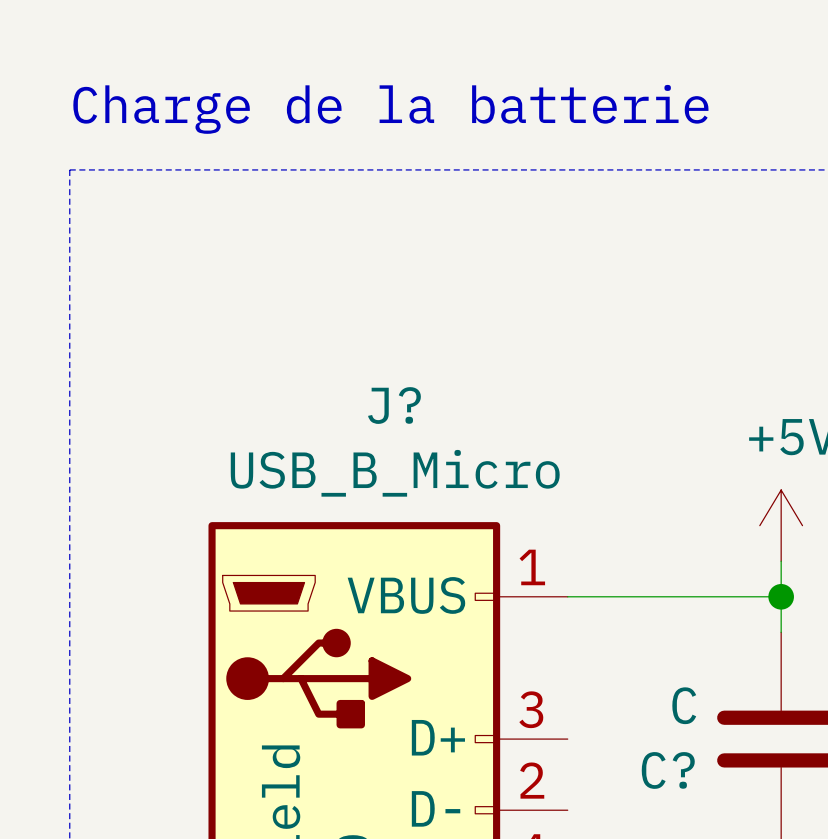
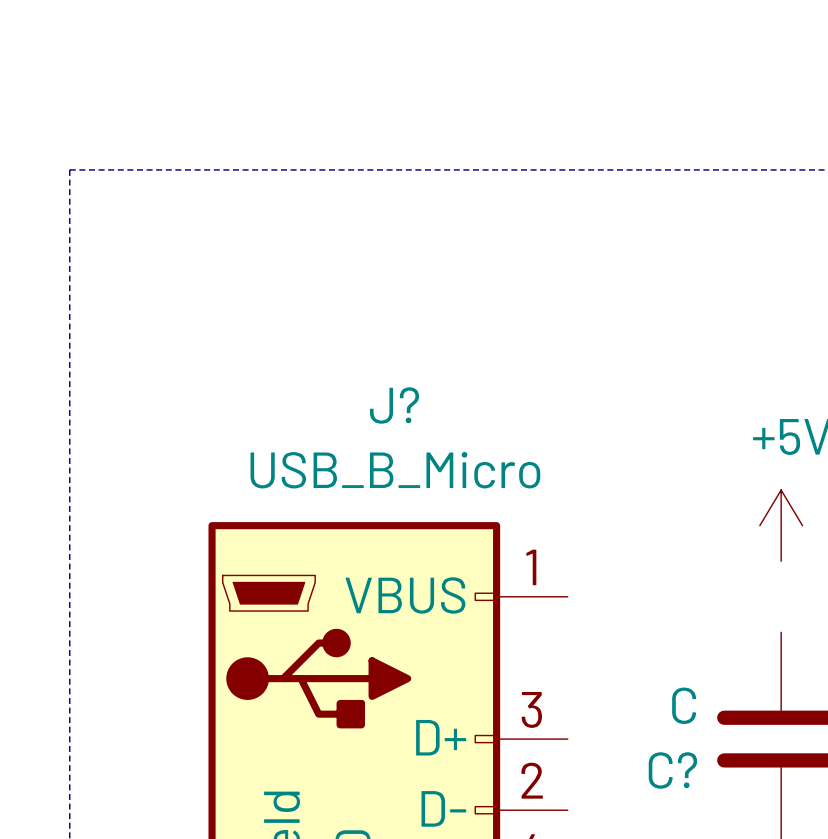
text: Charge de la batterie (390, 109) -> none
wire: (781, 561) (781, 632) -> none
wire: (567, 596) (781, 596) -> none
junction: (781, 596) -> none

